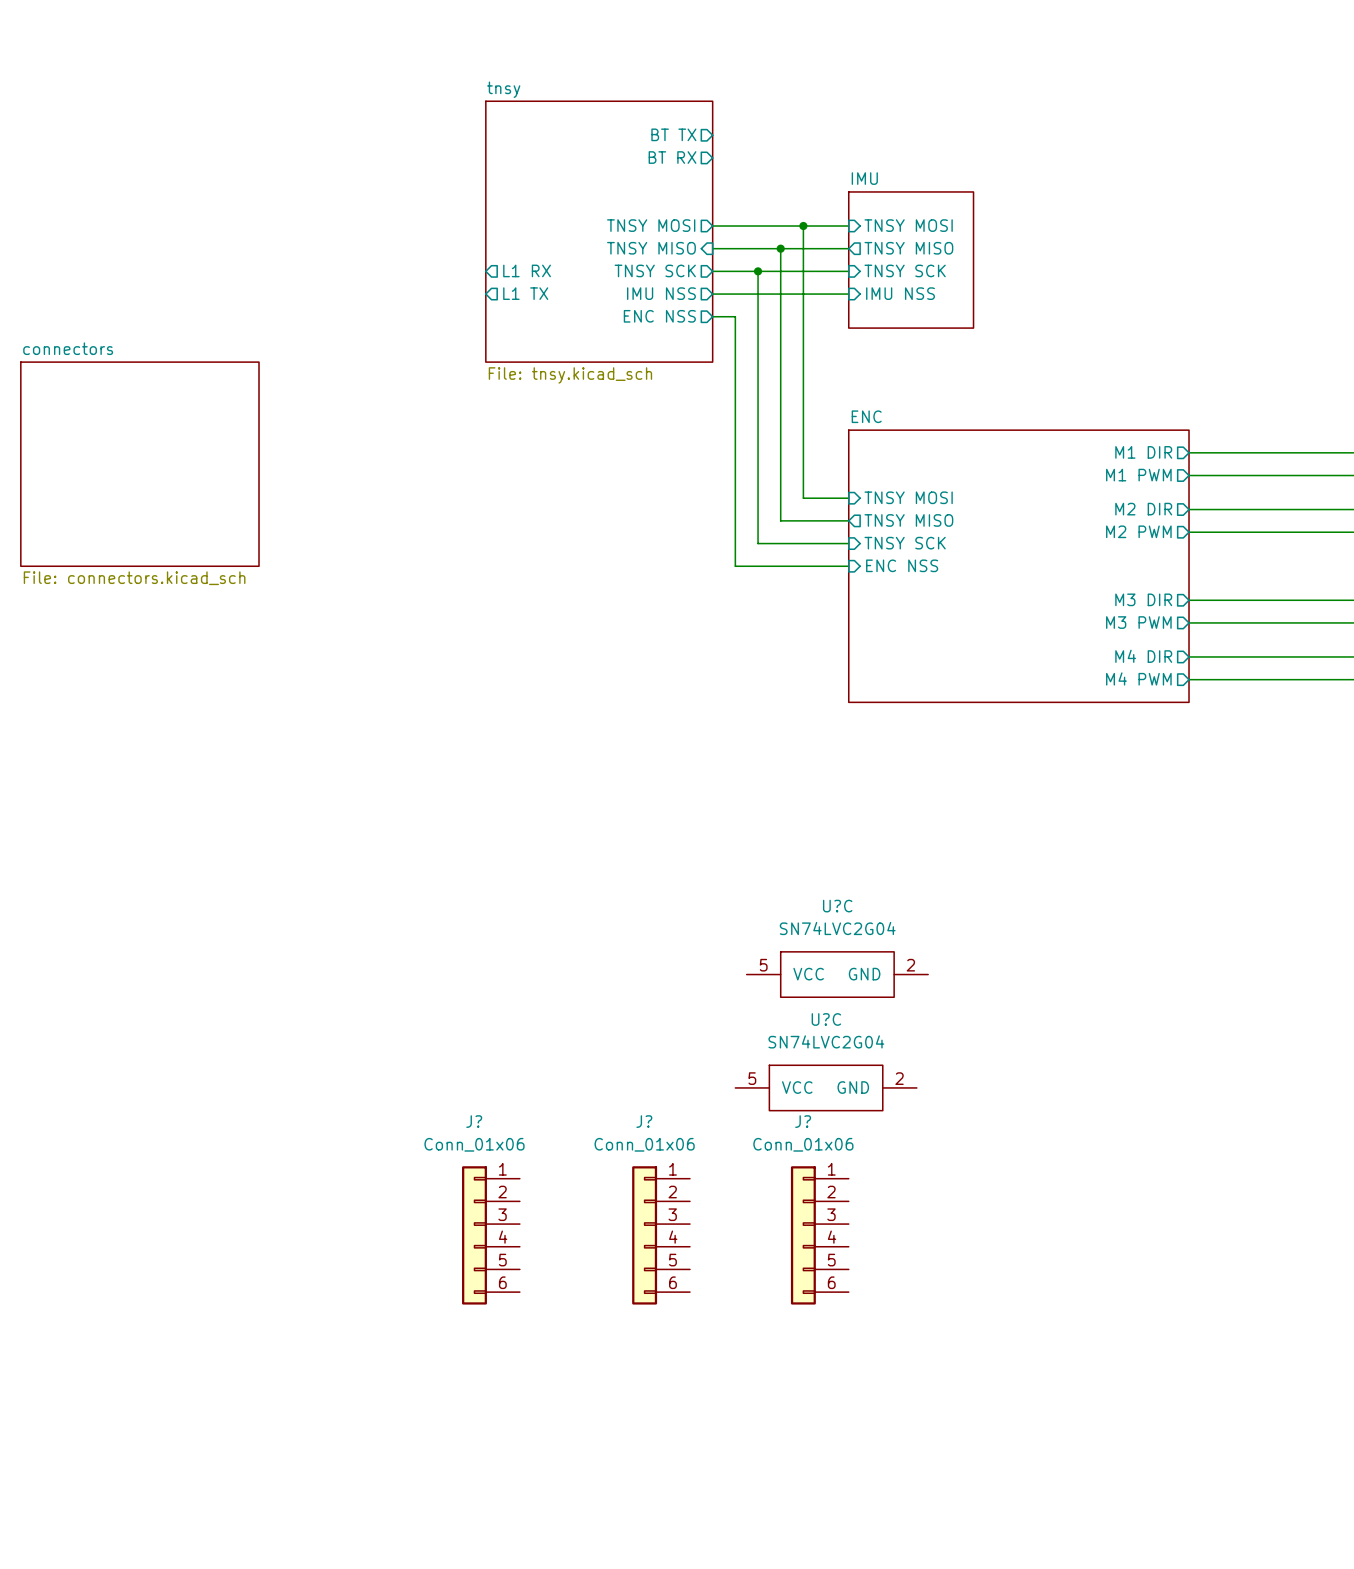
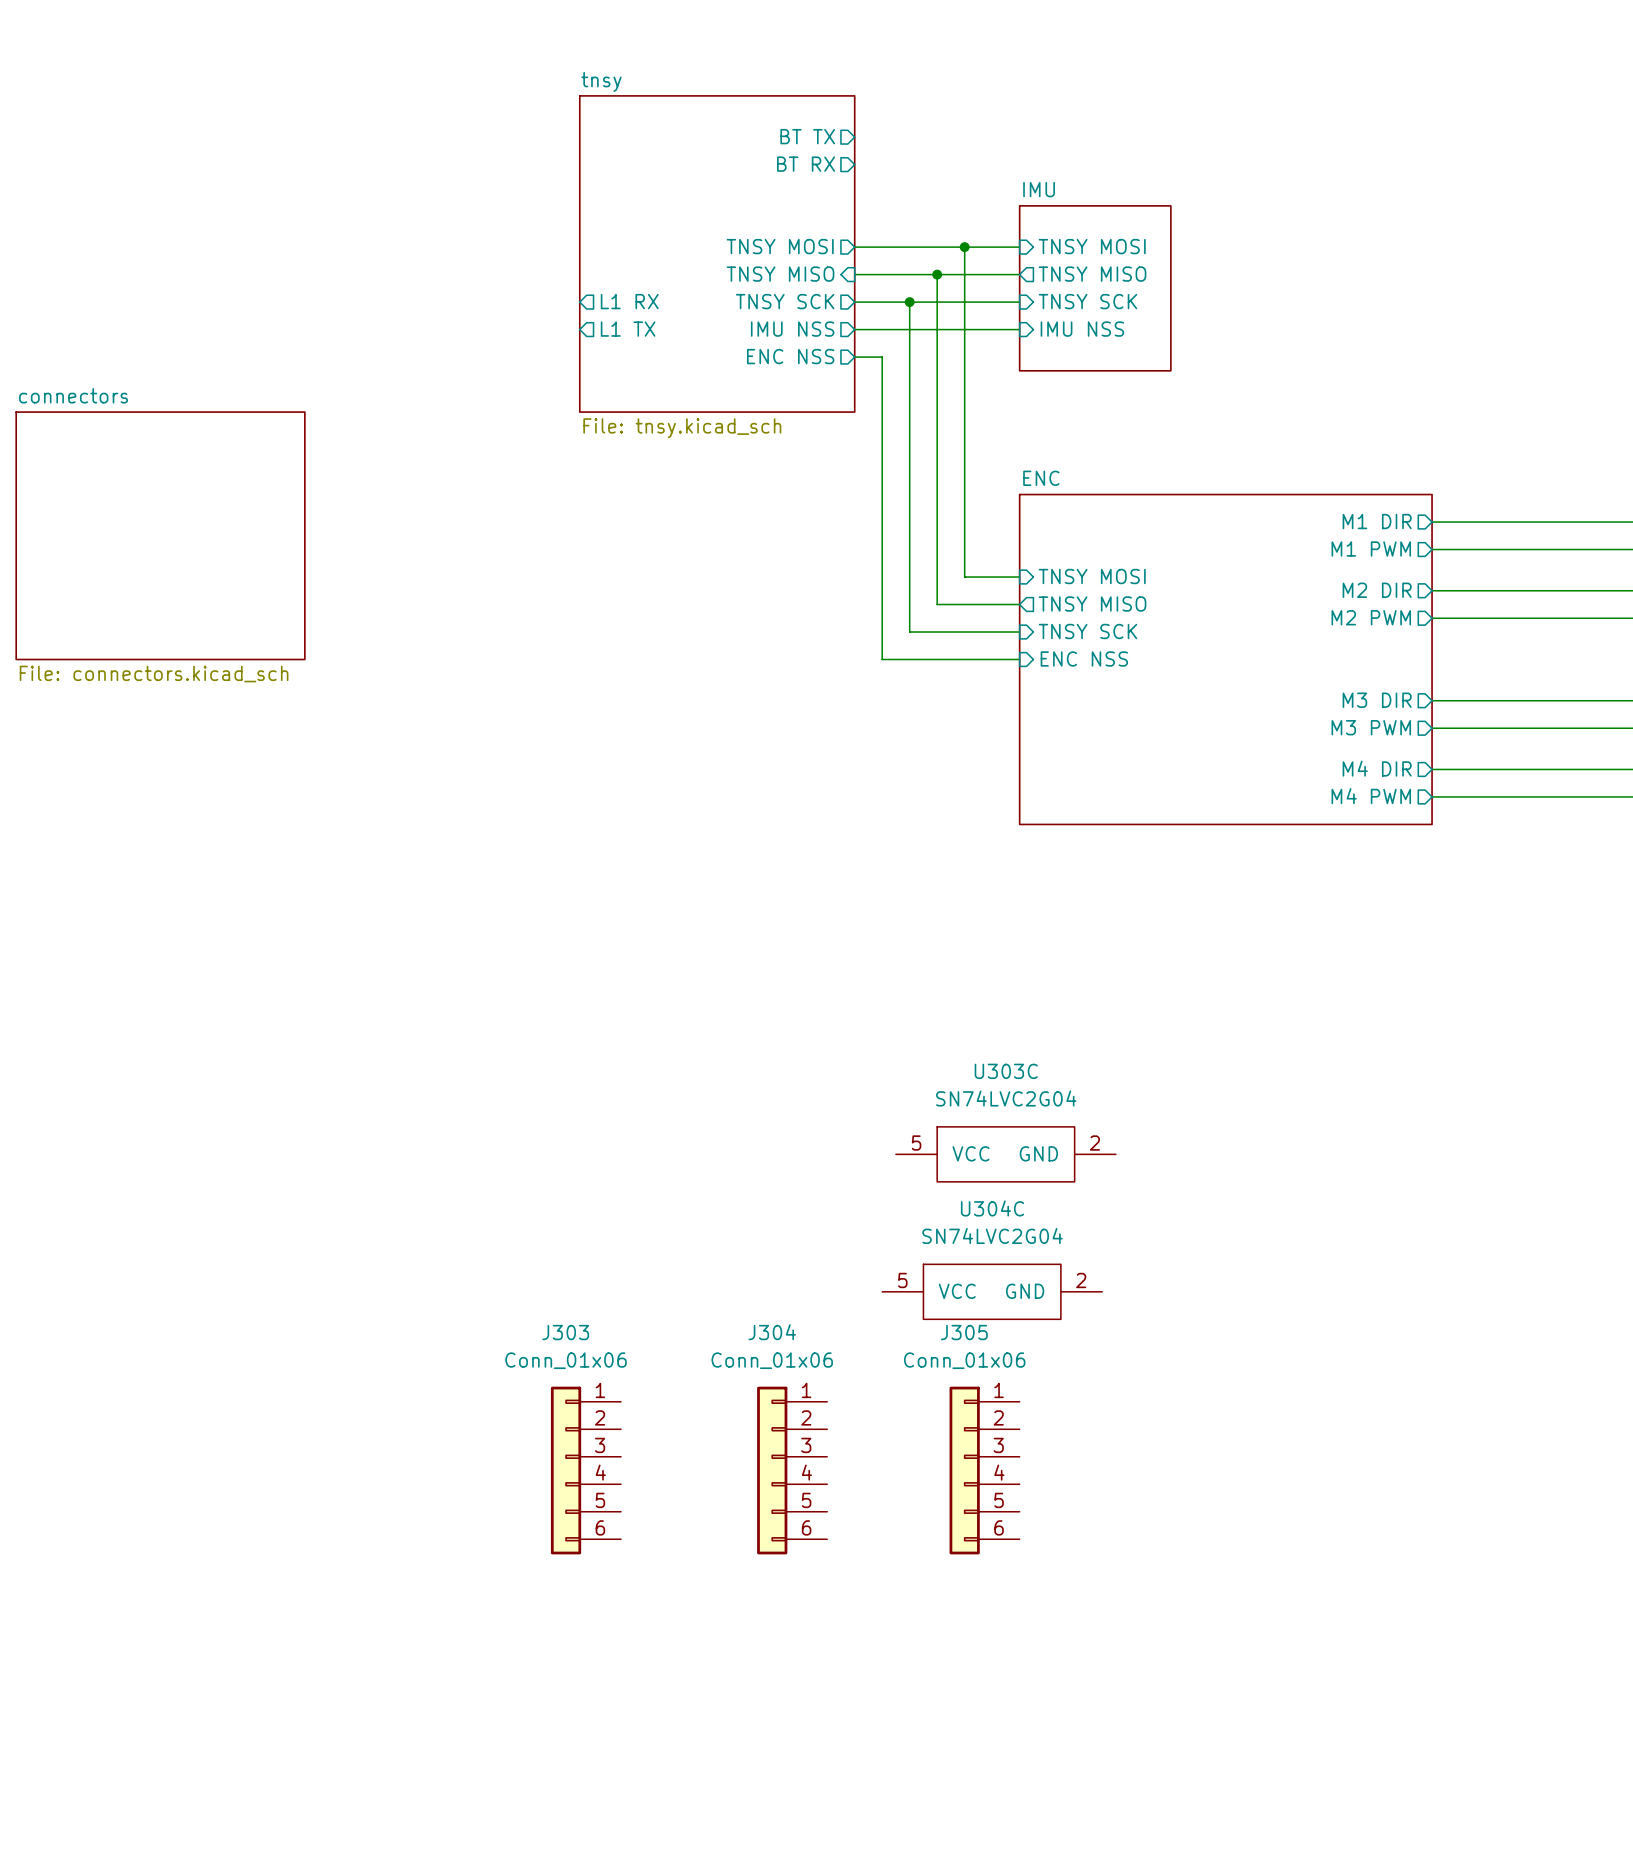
U?C name: U?C (837, 906) -> U303C (1006, 1071)
U?C name: U?C (826, 1019) -> U304C (992, 1208)
J? name: J? (474, 1121) -> J303 (565, 1332)
J? name: J? (644, 1121) -> J304 (772, 1332)
J? name: J? (803, 1121) -> J305 (964, 1332)

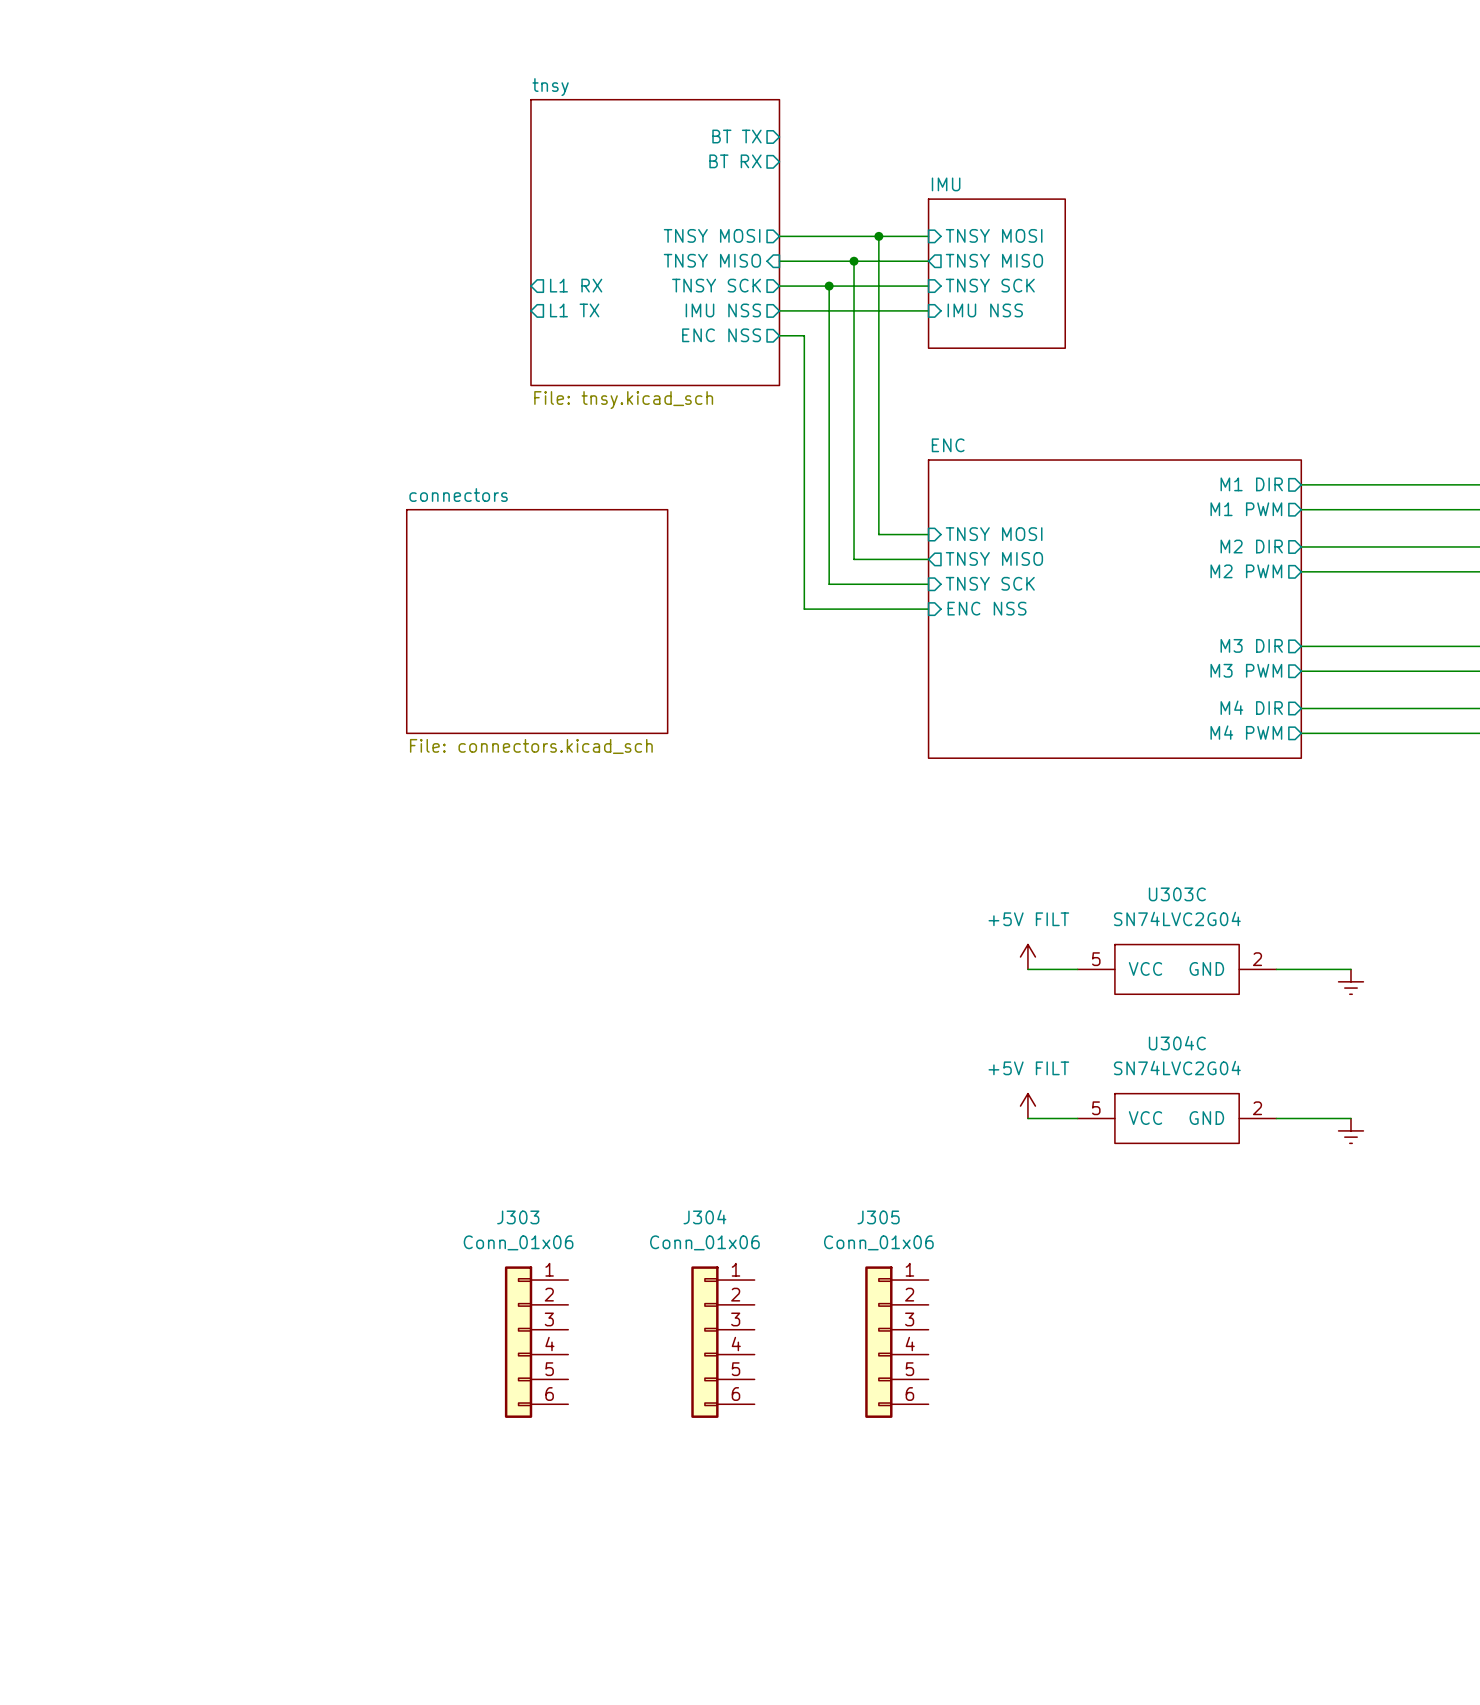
sheet connectors: File: connectors.kicad_sch (160, 535) -> none
sheet connectors: none -> File: connectors.kicad_sch (537, 621)
power symbol: none -> +5V FILT (1027, 956)
wire: none -> (1027, 969) (1077, 969)
wire: none -> (1276, 969) (1350, 969)
power symbol: none -> (1350, 981)
U303C position: (1005, 1154) -> (1177, 969)
power symbol: none -> +5V FILT (1027, 1106)
wire: none -> (1027, 1118) (1077, 1118)
wire: none -> (1276, 1118) (1350, 1118)
power symbol: none -> (1350, 1130)
U304C position: (992, 1291) -> (1177, 1118)

